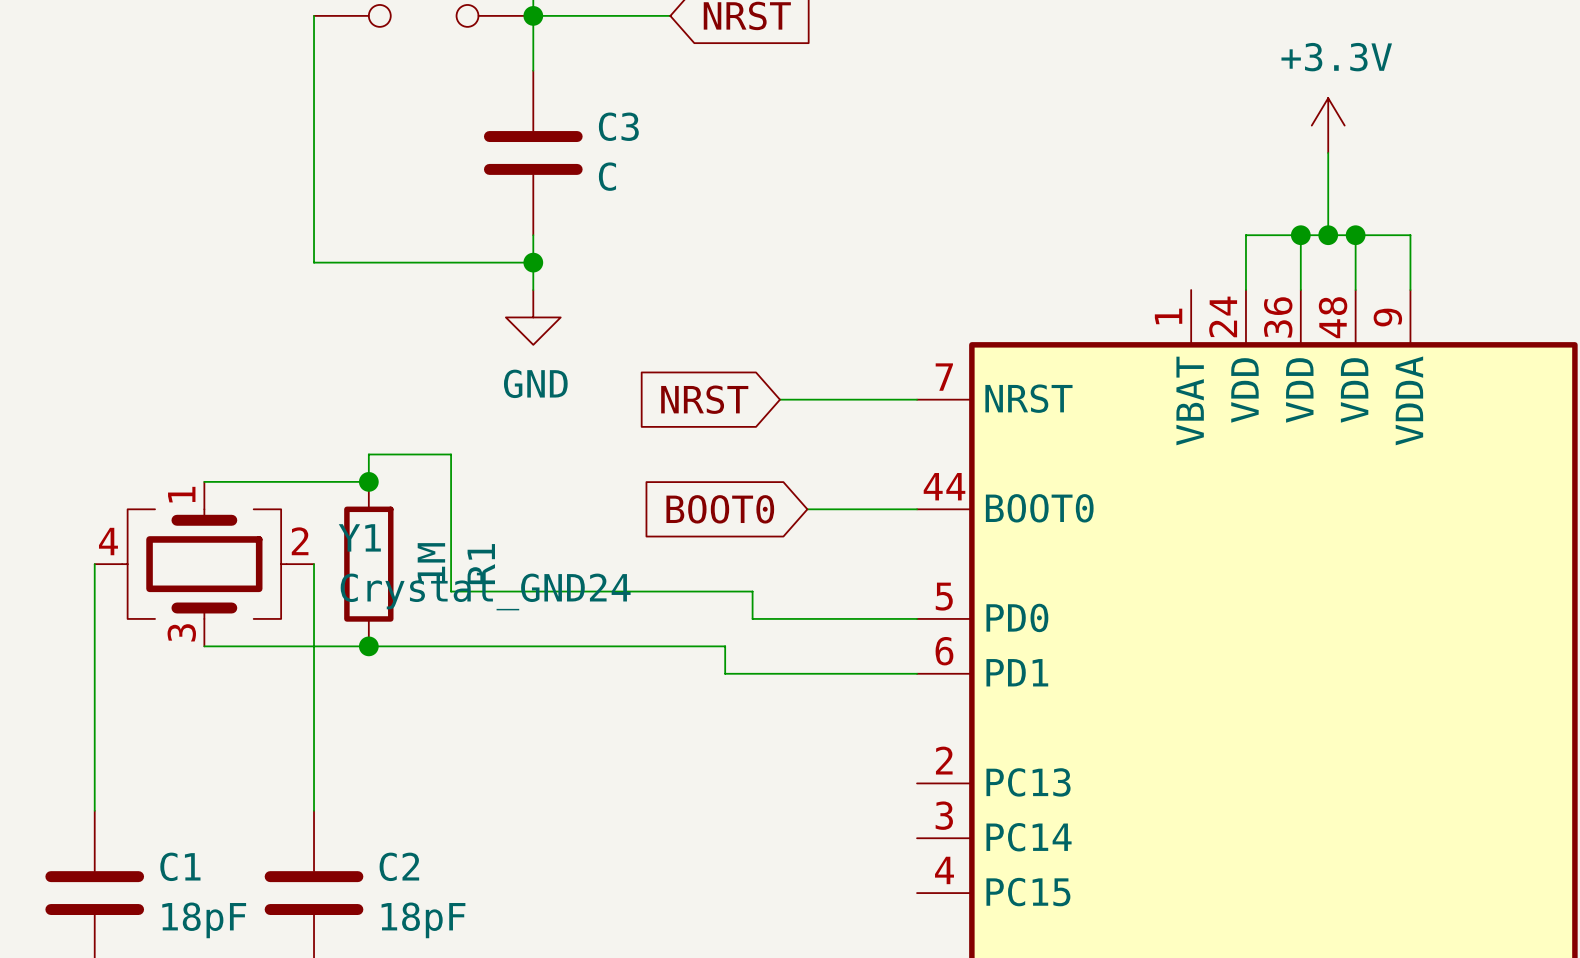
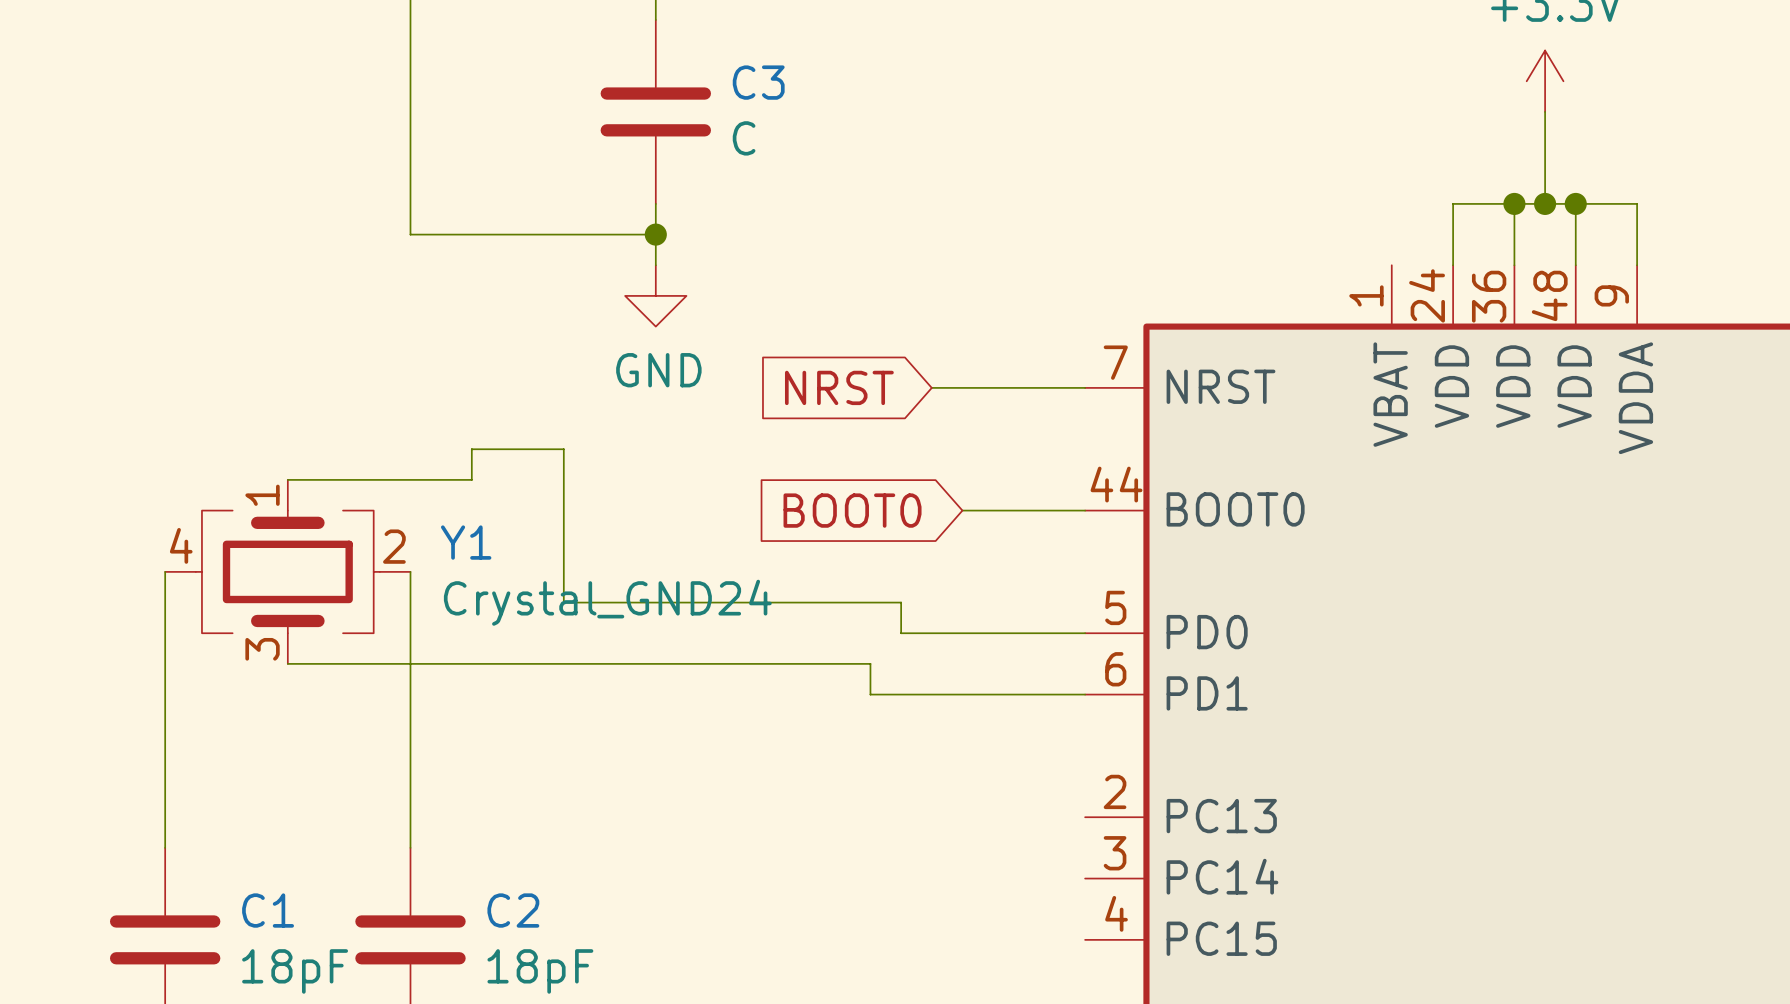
junction: (368, 481) -> none
R1: 1M (368, 564) -> none
junction: (368, 646) -> none

